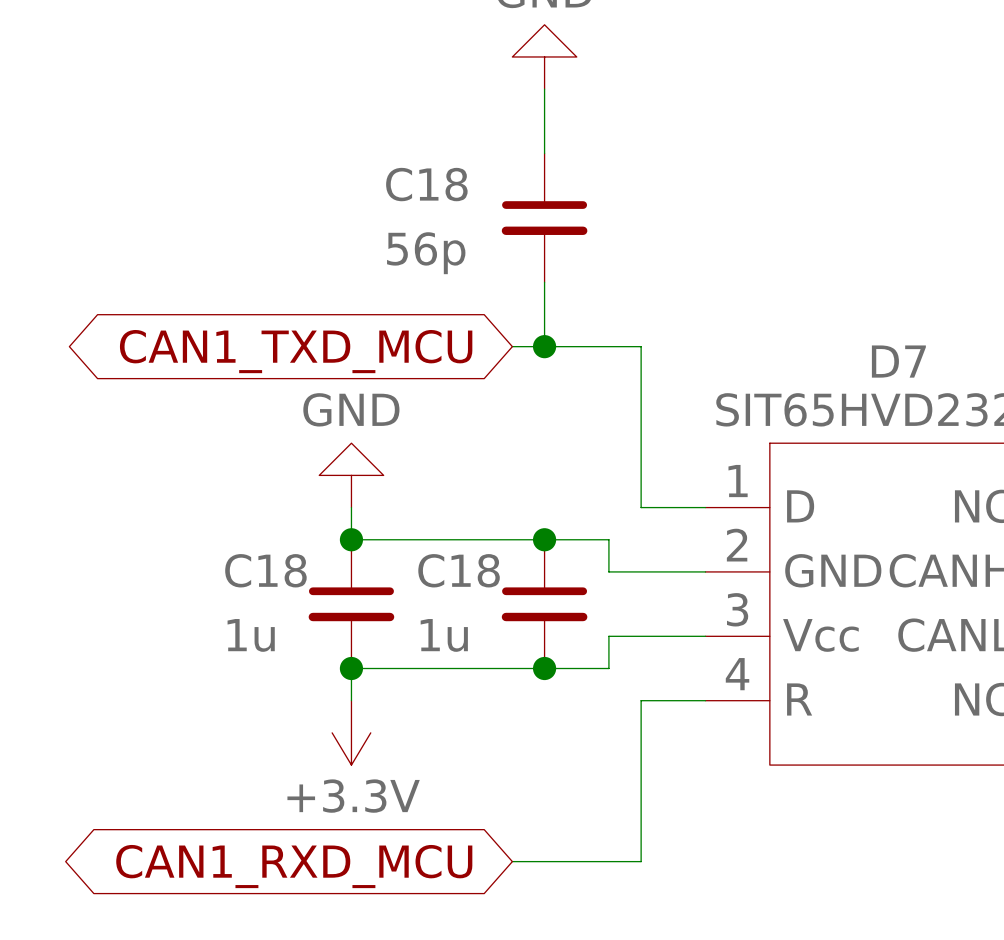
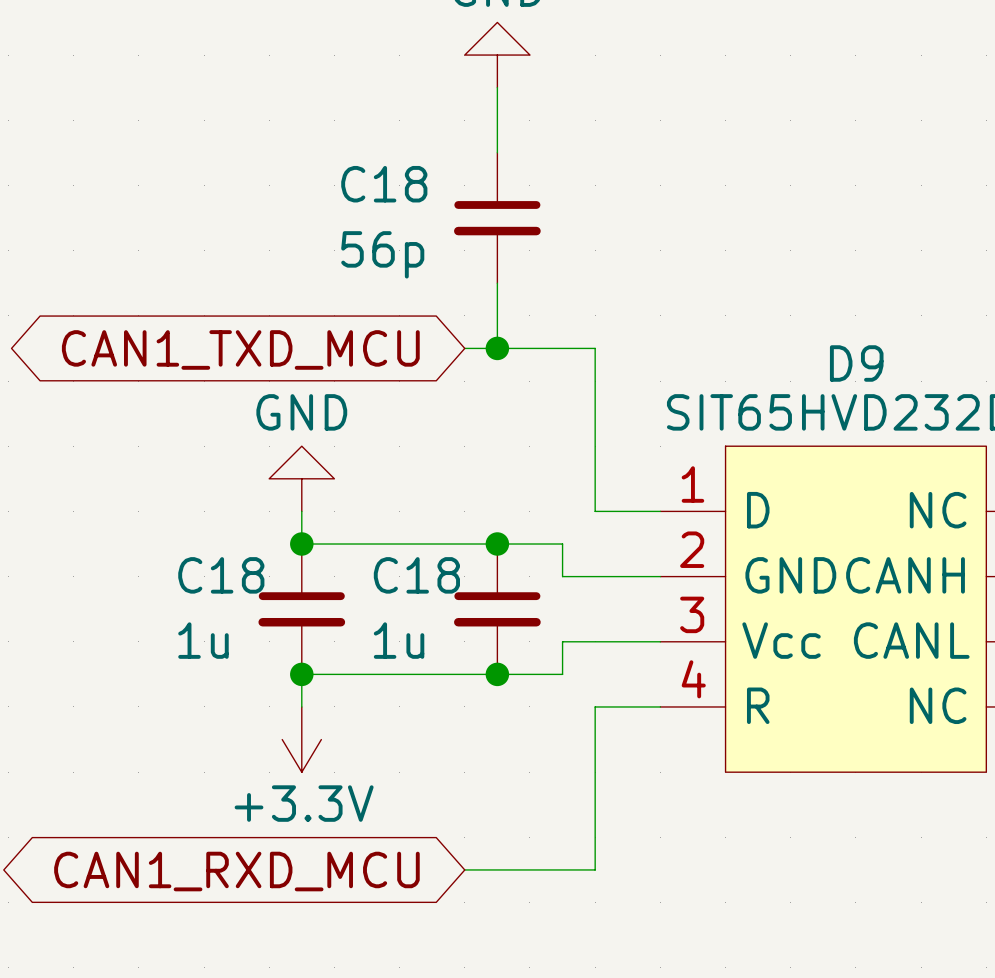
D7 name: D7 (898, 361) -> D9 (856, 363)

